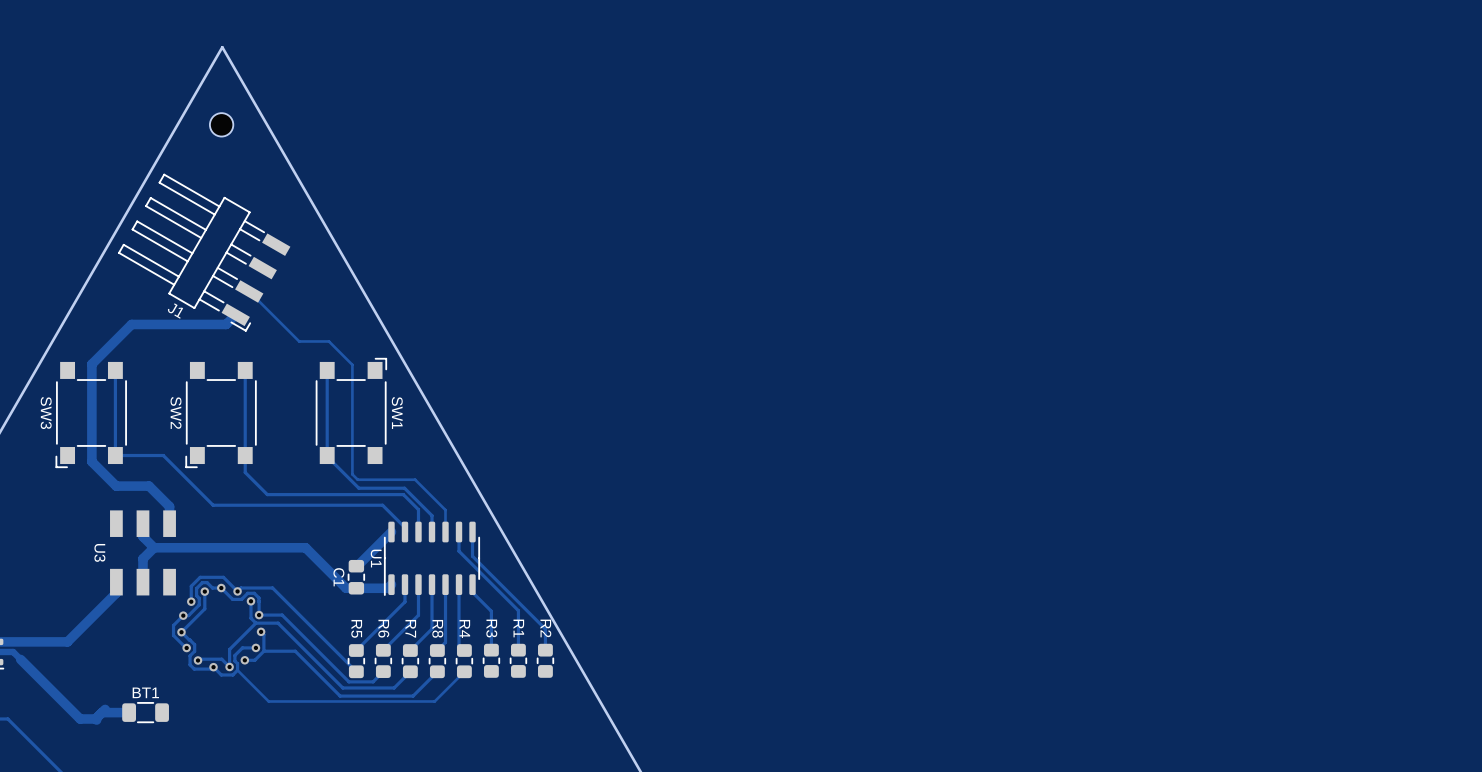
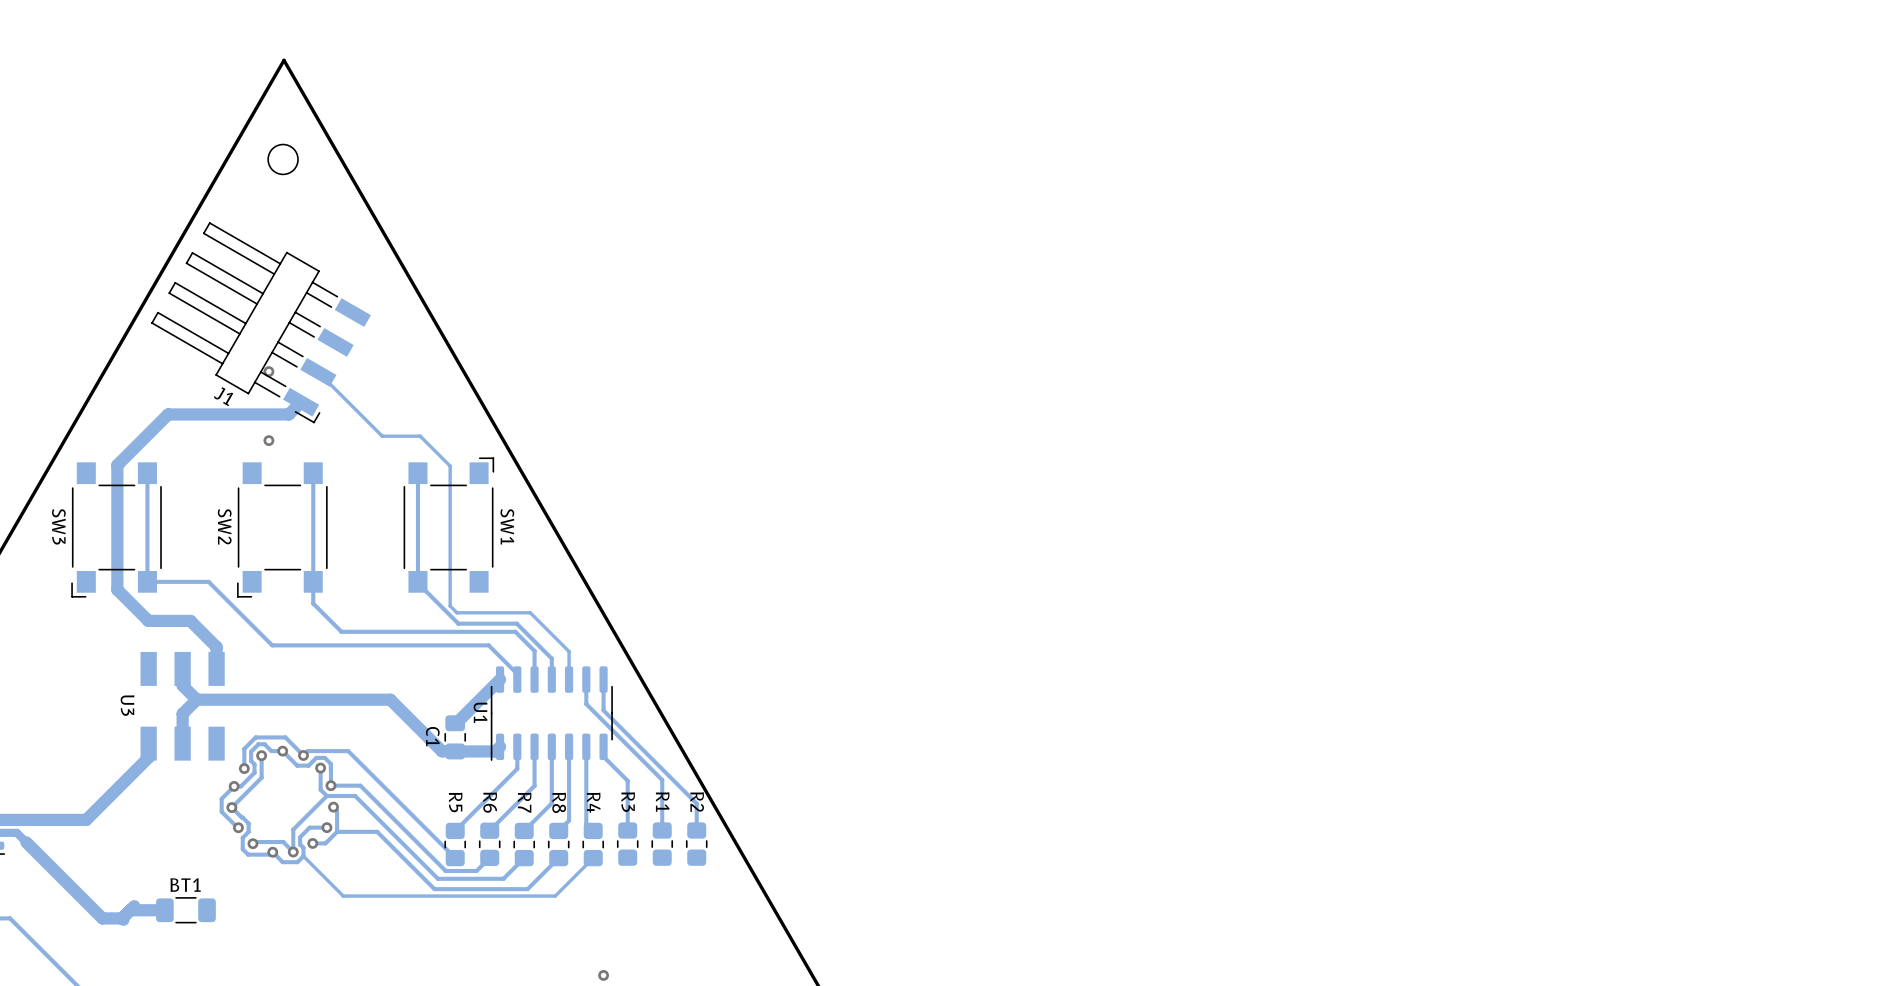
via: none -> (268, 371)
via: none -> (268, 440)
via: none -> (603, 975)

